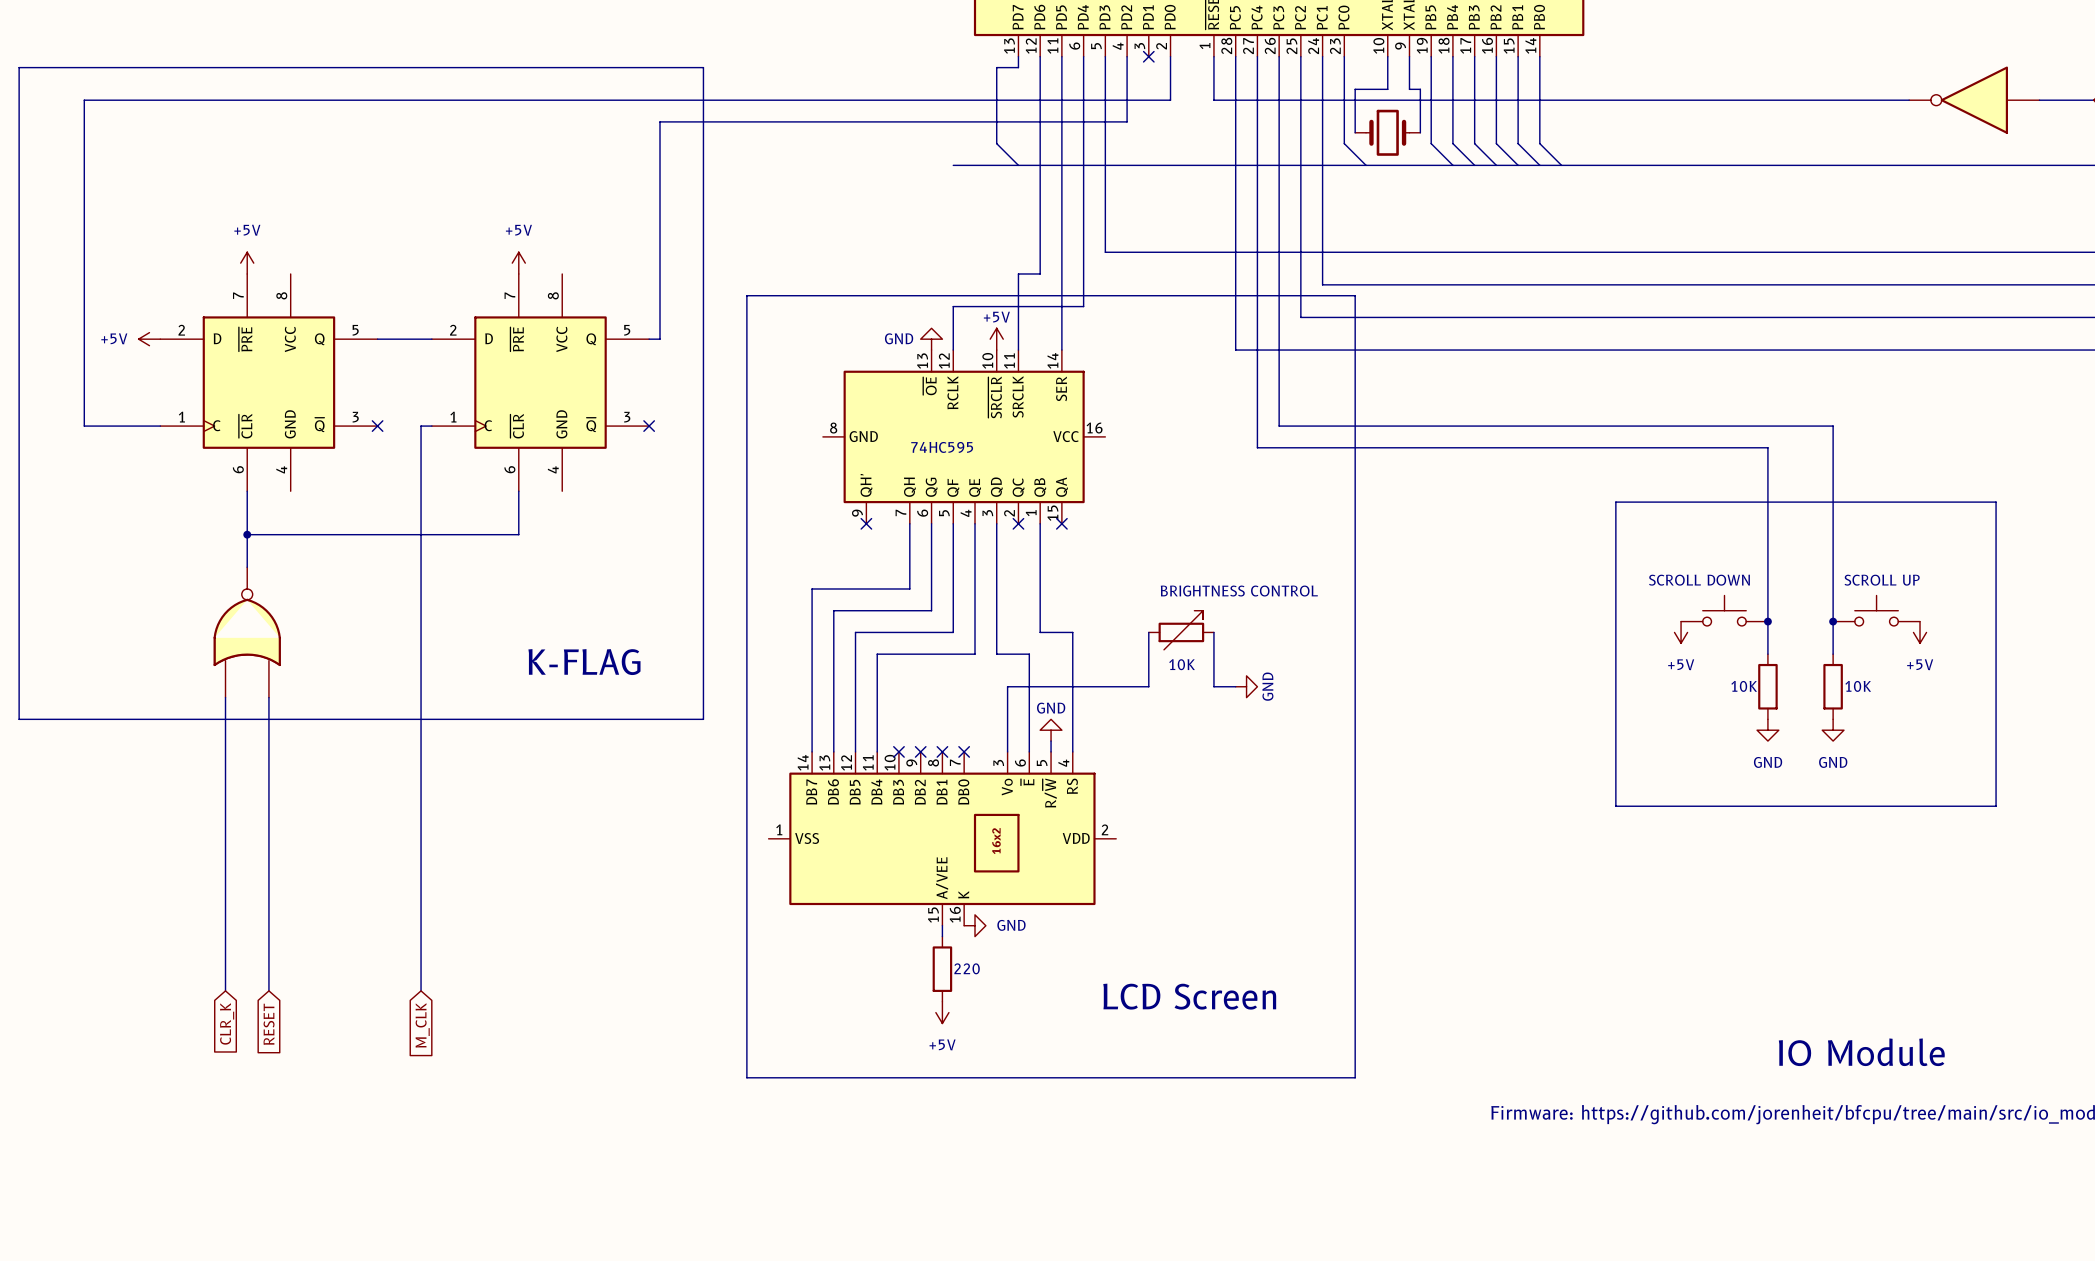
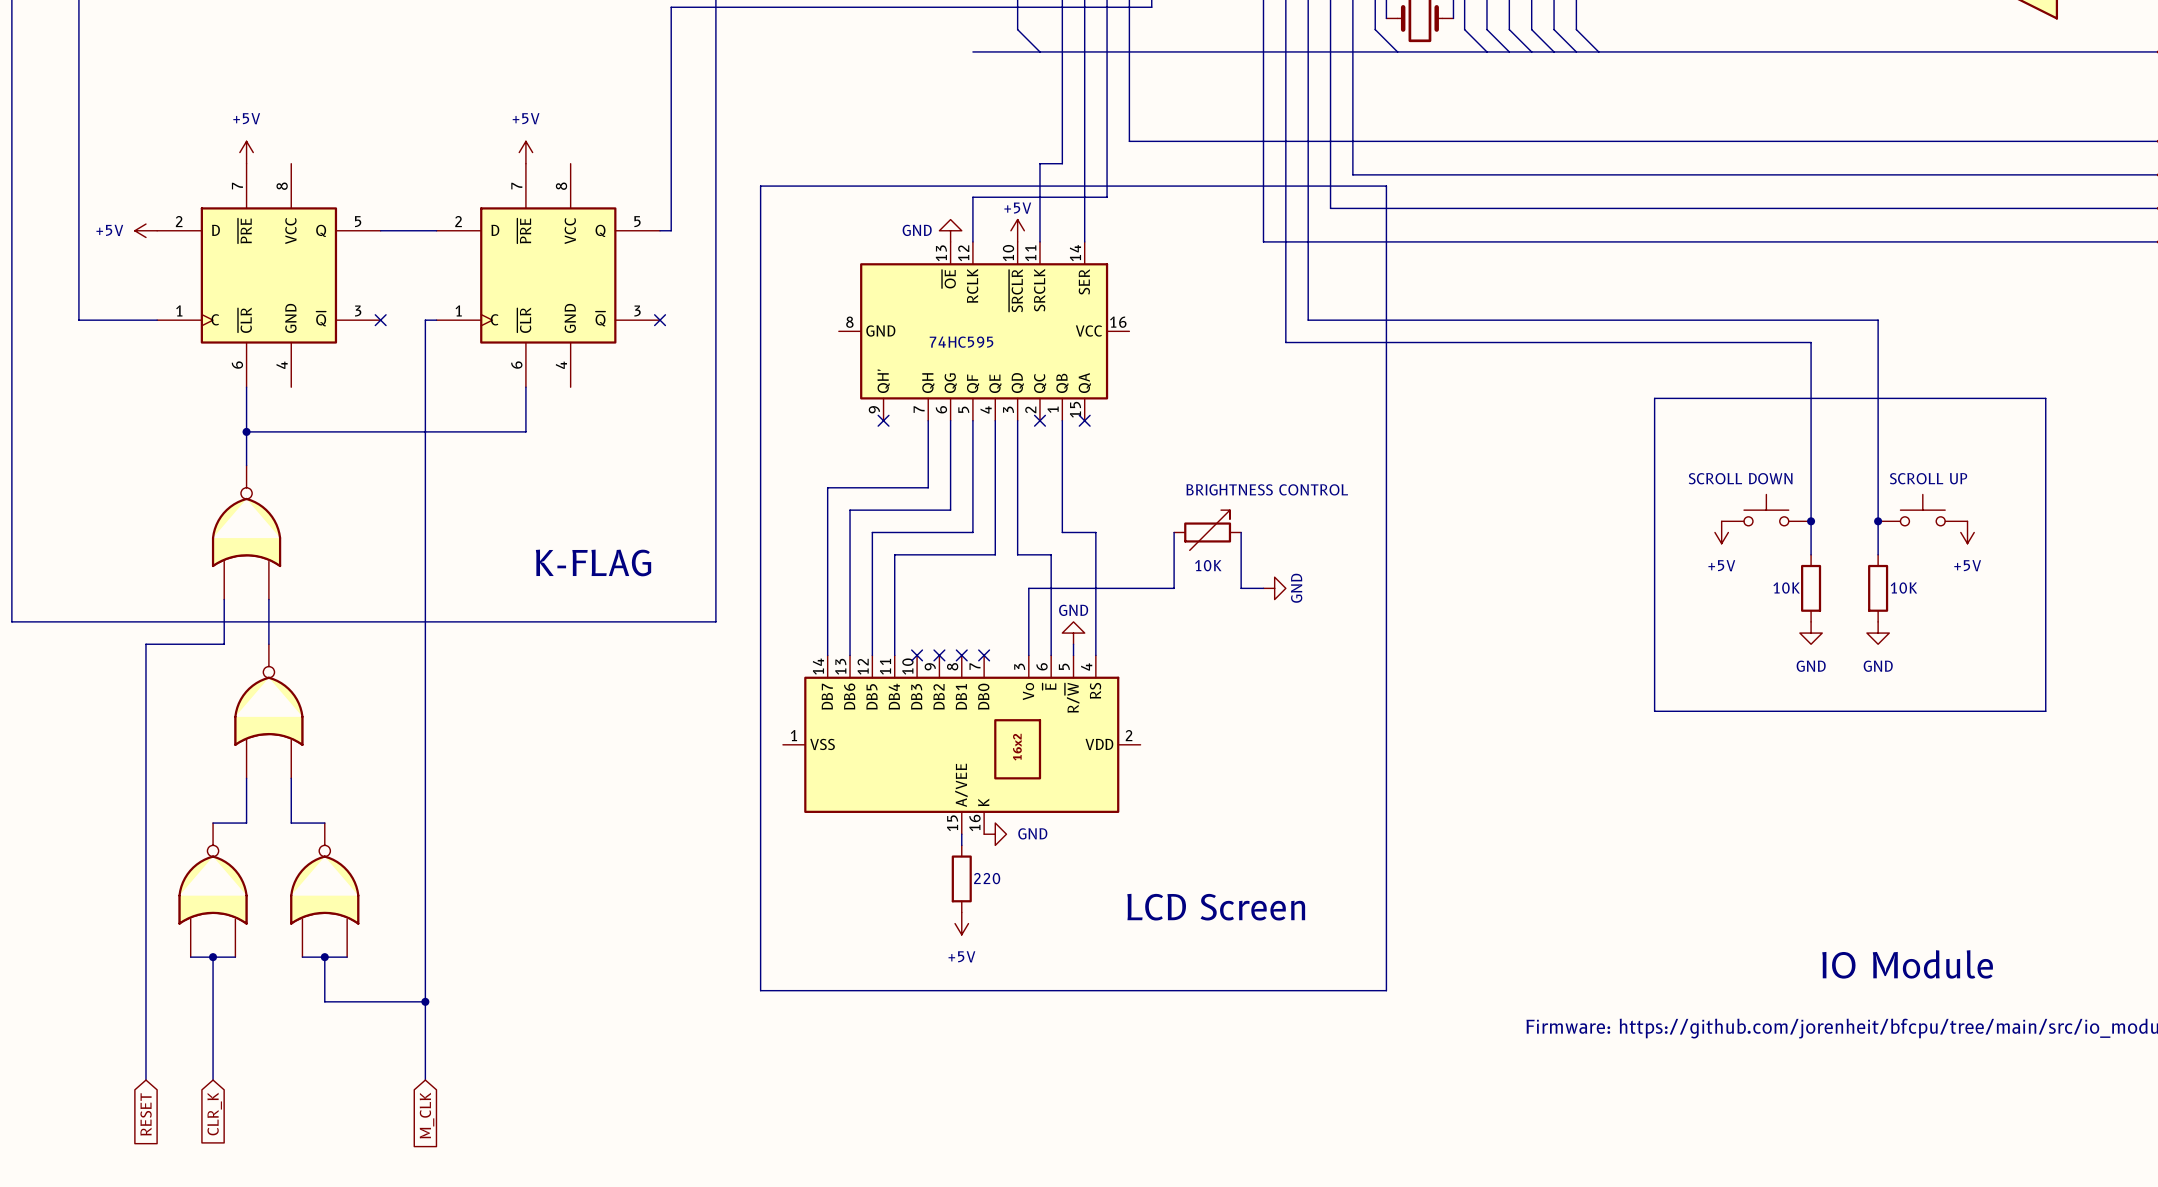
wire: (225, 741) (225, 990) -> (224, 644) (145, 644) (145, 1080)
wire: (268, 741) (268, 990) -> none
part: none -> (268, 711)
wire: none -> (246, 778) (246, 823) (213, 823)
wire: none -> (291, 778) (291, 823) (324, 823)
part: none -> (213, 890)
part: none -> (324, 890)
wire: none -> (425, 901) (425, 1080)
global label position: CLR_K (227, 1023) -> CLR_K (214, 1114)
global label position: RESET (269, 1024) -> RESET (146, 1114)
global label position: M_CLK (422, 1025) -> M_CLK (427, 1115)
wire: none -> (190, 957) (235, 957)
wire: none -> (213, 957) (213, 1080)
junction: none -> (213, 957)
wire: none -> (302, 957) (347, 957)
wire: none -> (324, 957) (324, 1001) (425, 1001)
junction: none -> (324, 957)
junction: none -> (425, 1001)

